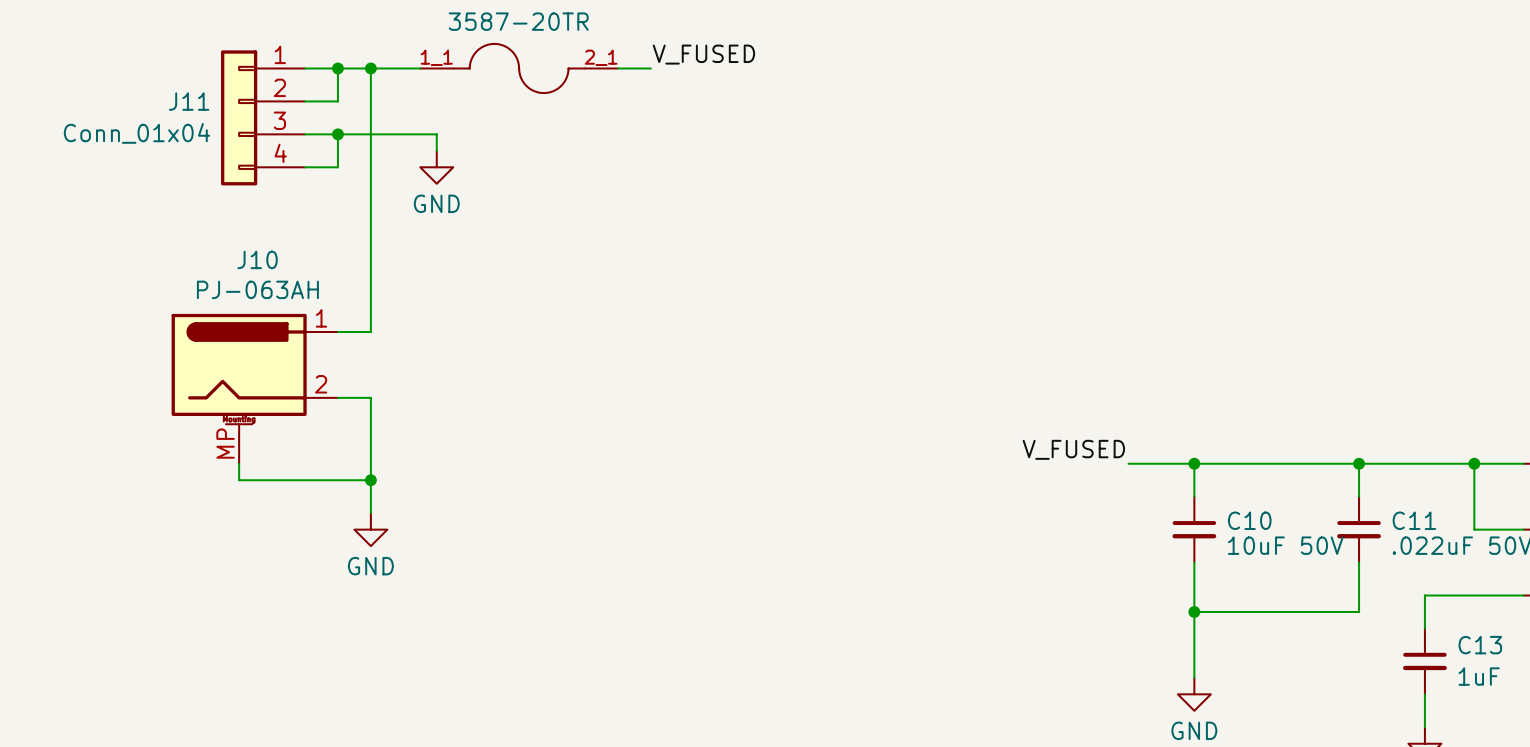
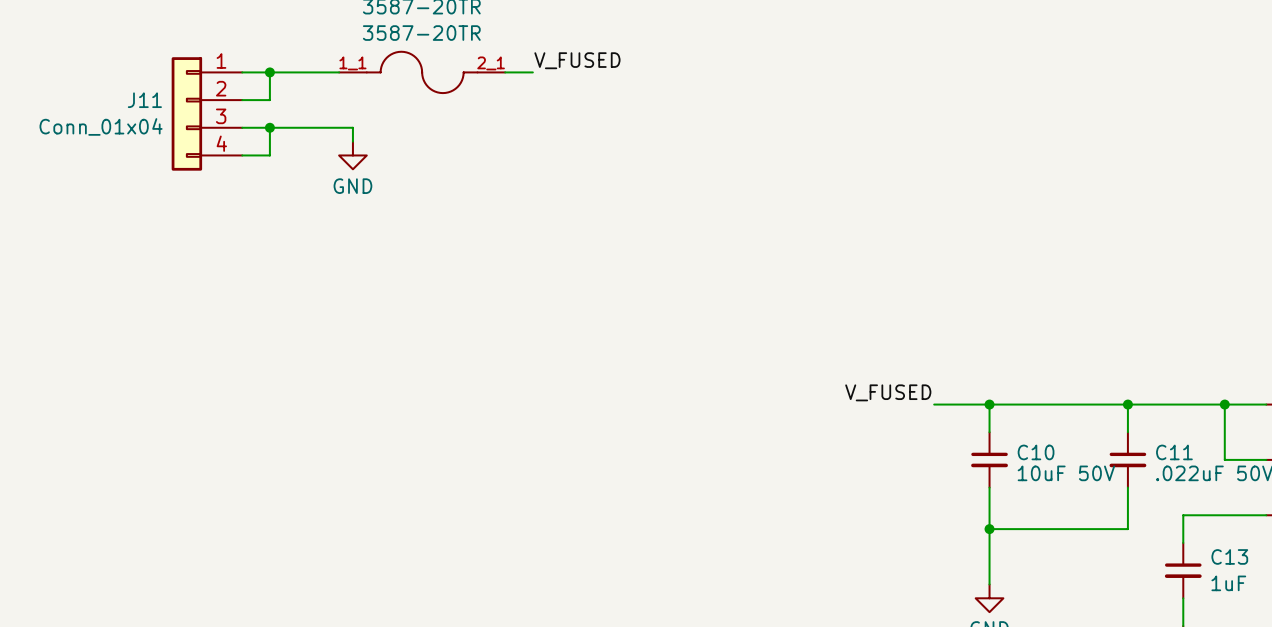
wire: (370, 68) (370, 332) (337, 332) -> none
junction: (370, 68) -> none
J10: PJ-063AH (254, 388) -> none
wire: (337, 397) (370, 397) (370, 513) -> none
wire: (239, 463) (239, 480) (370, 480) -> none
junction: (370, 480) -> none
power symbol: GND (370, 529) -> none

